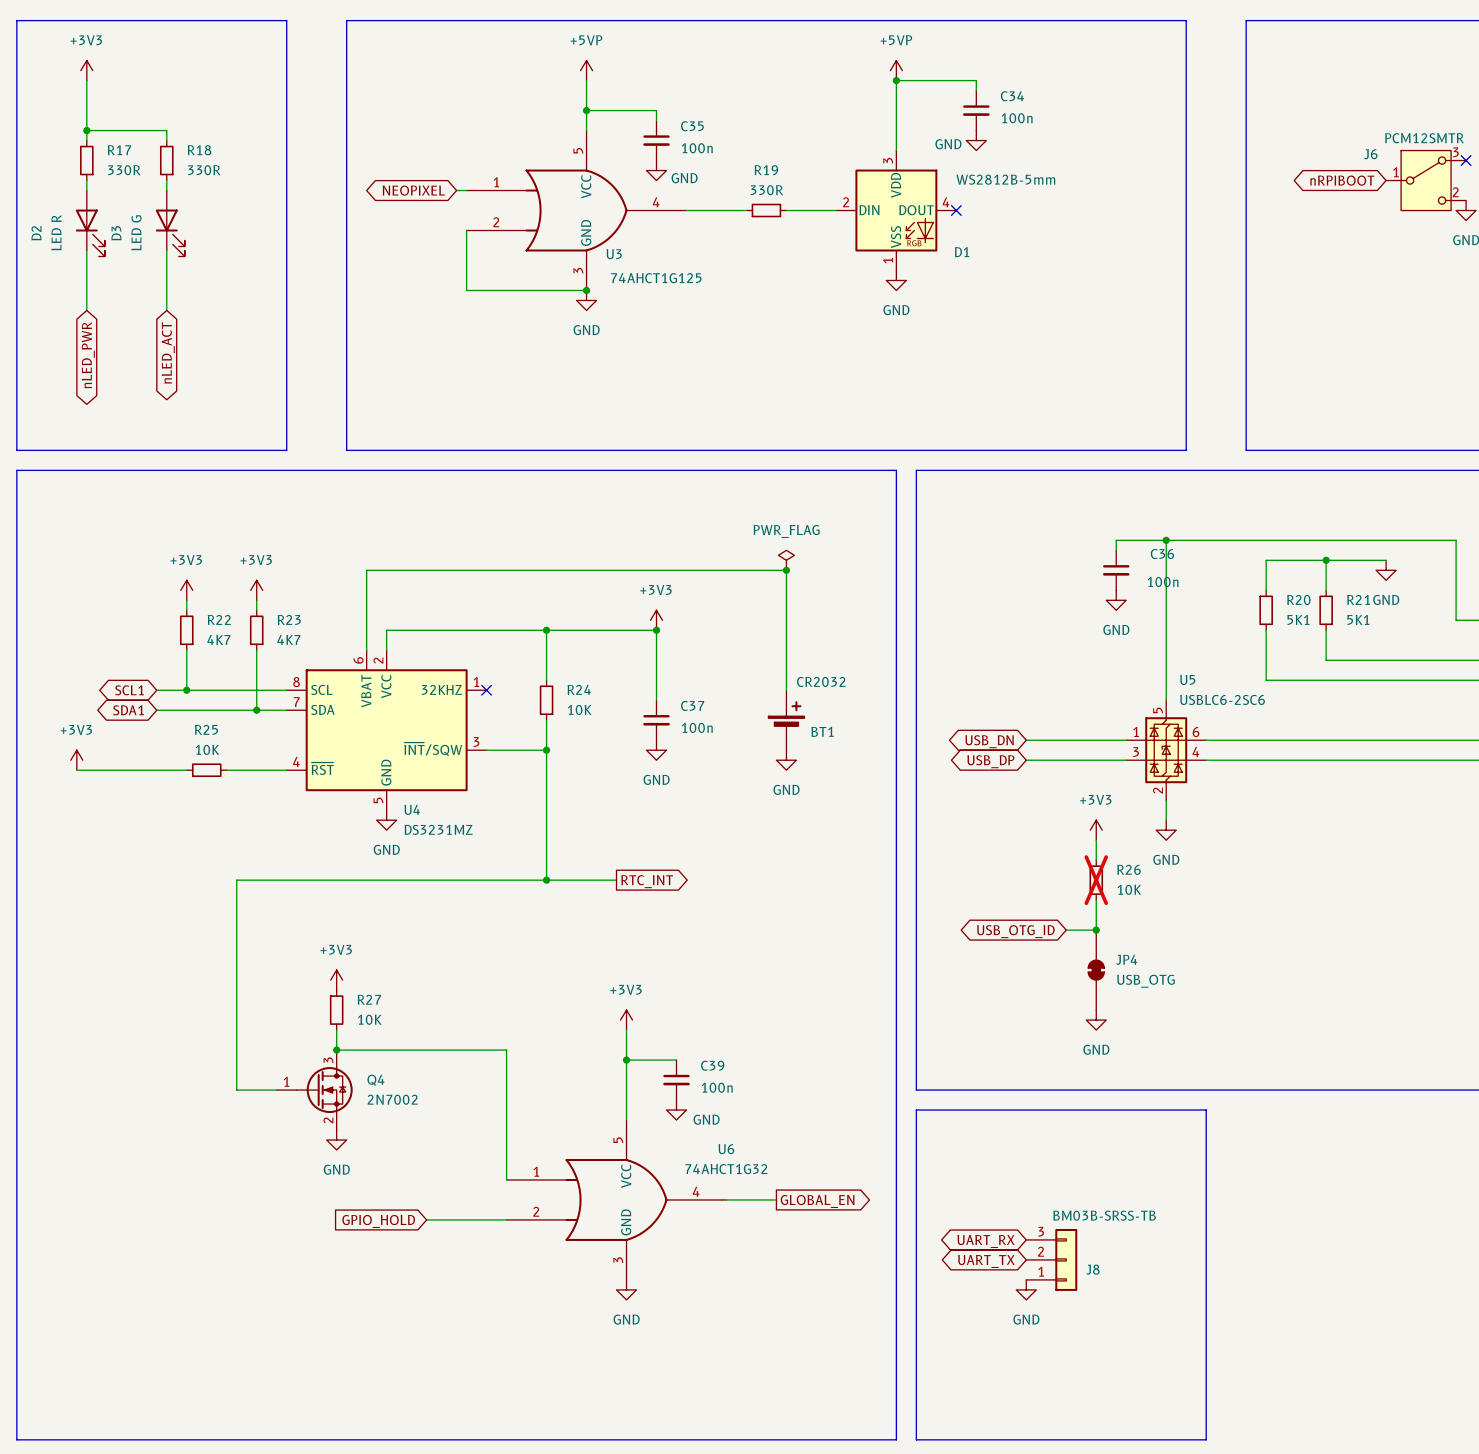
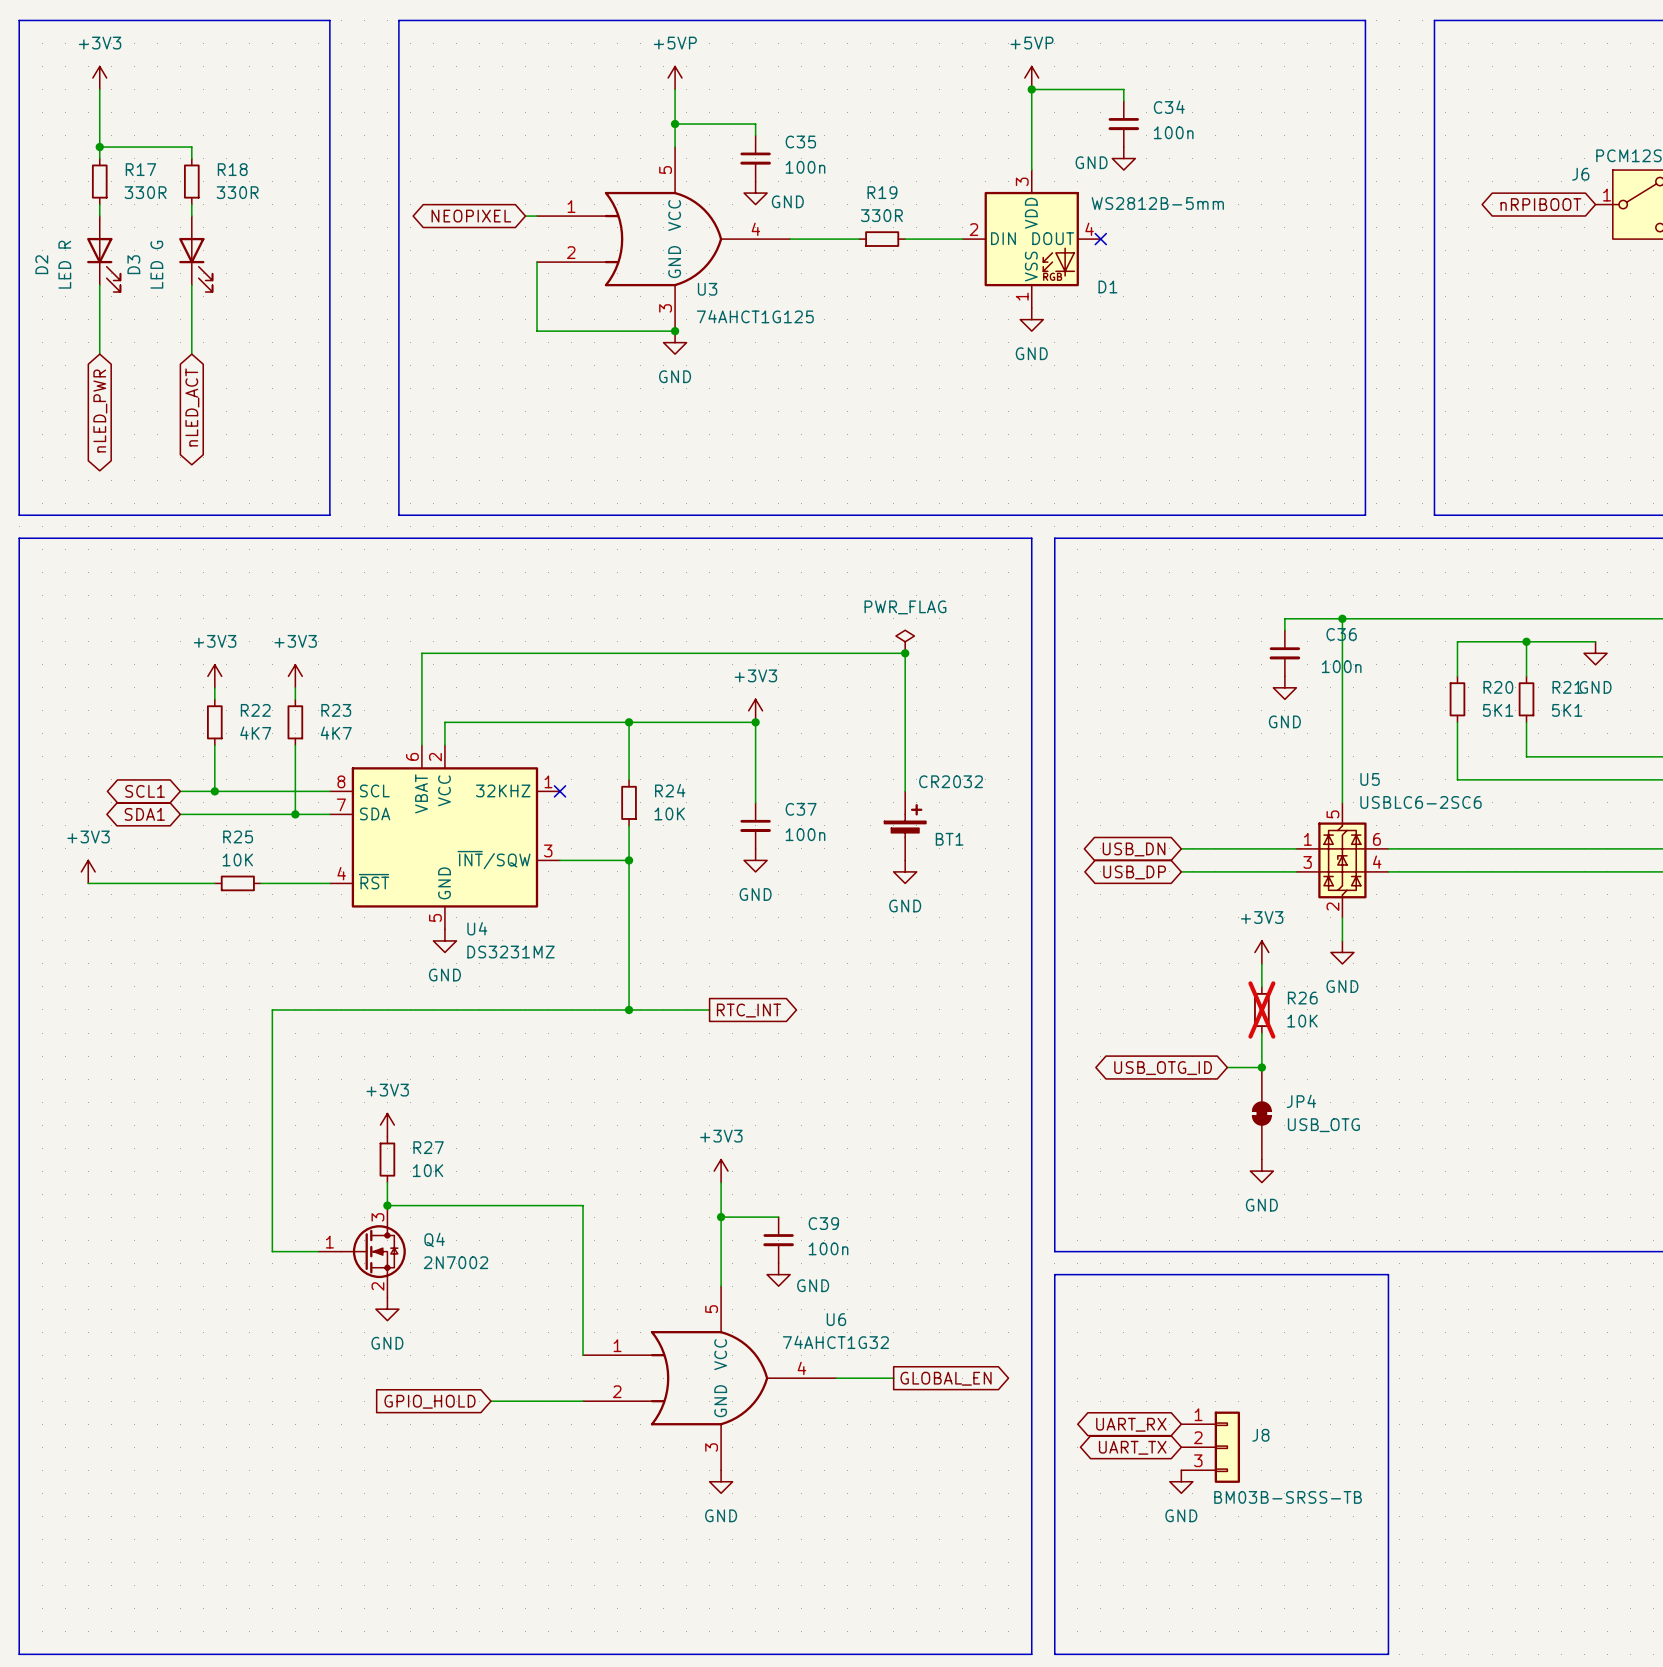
J8 flip: as is (1066, 1259) -> up-down (1227, 1447)

